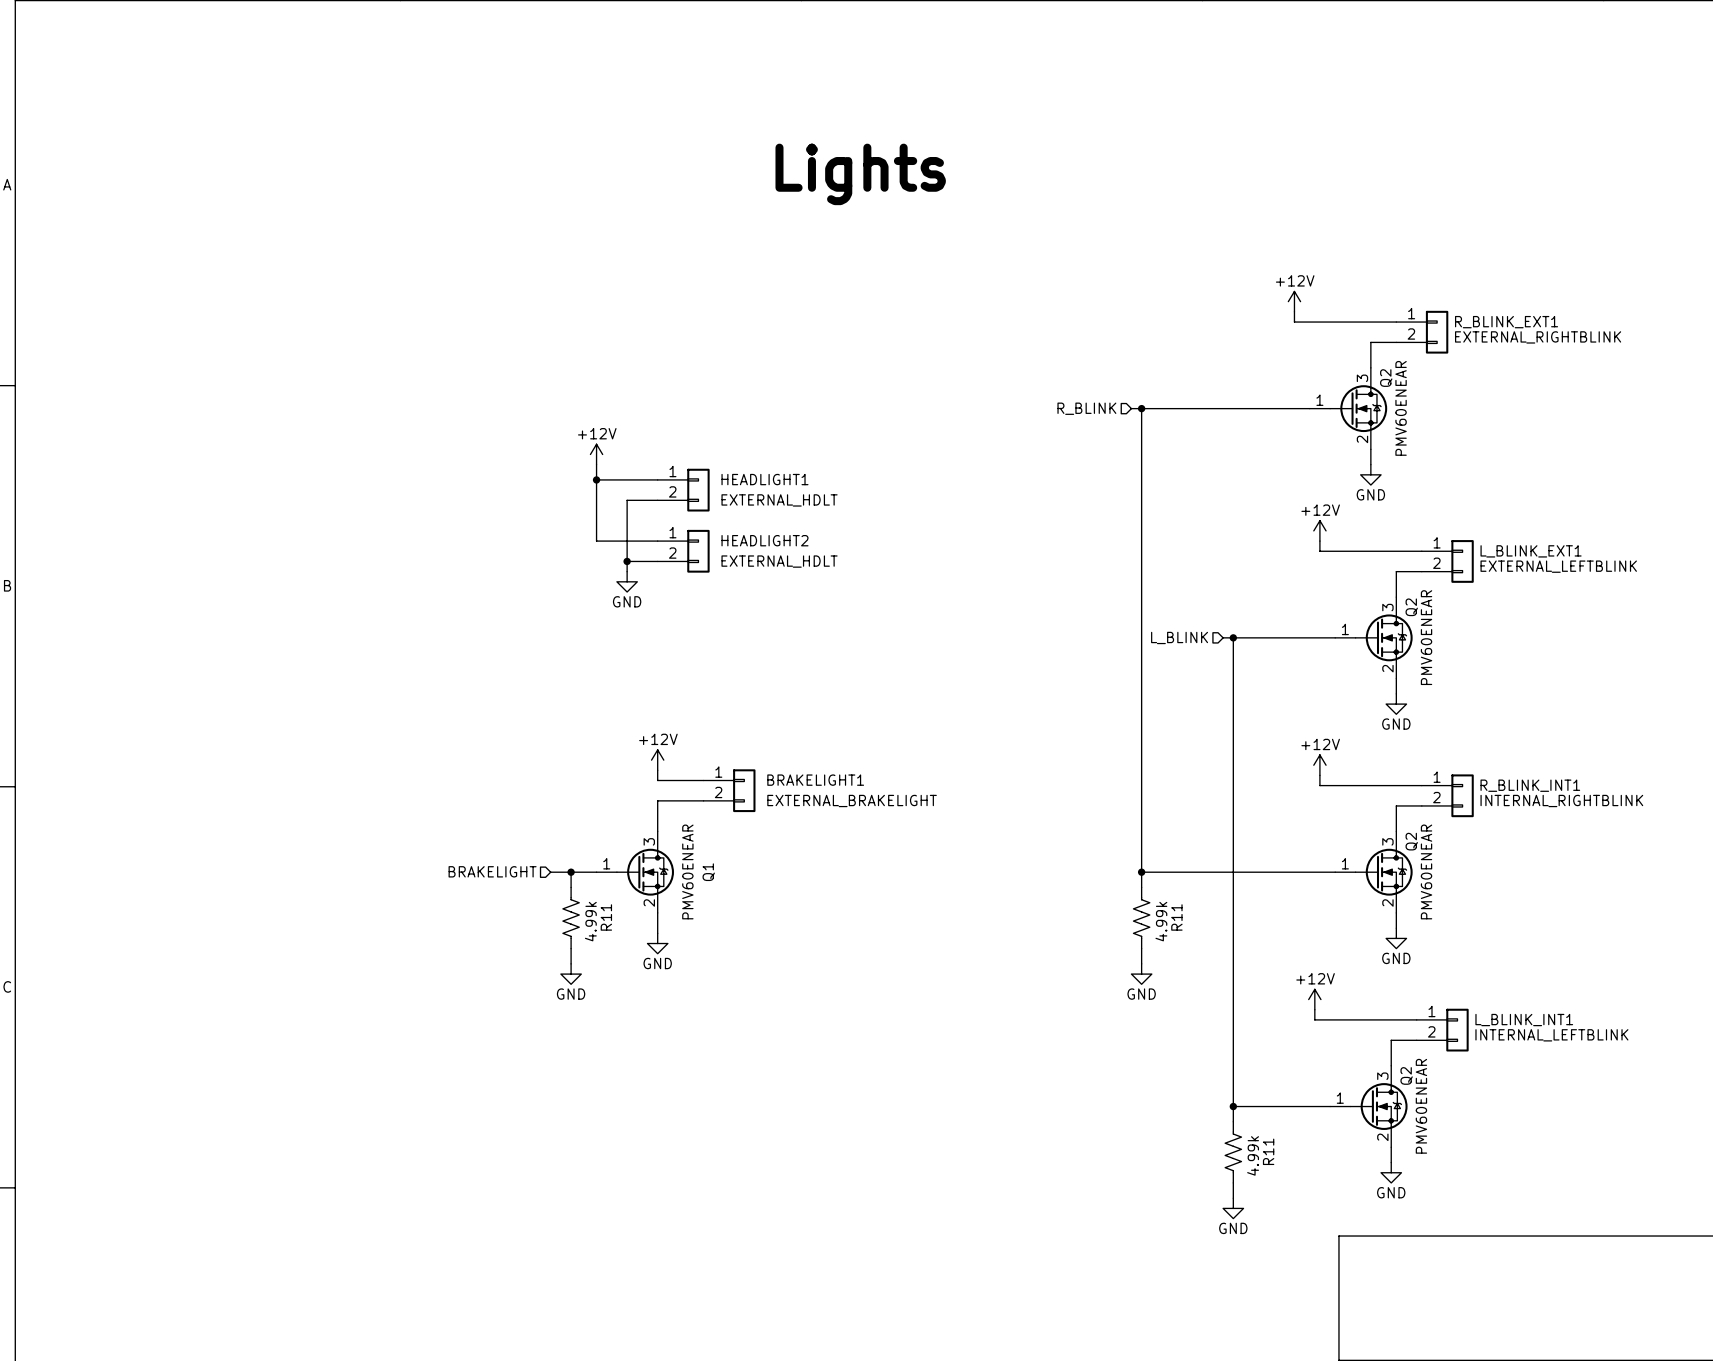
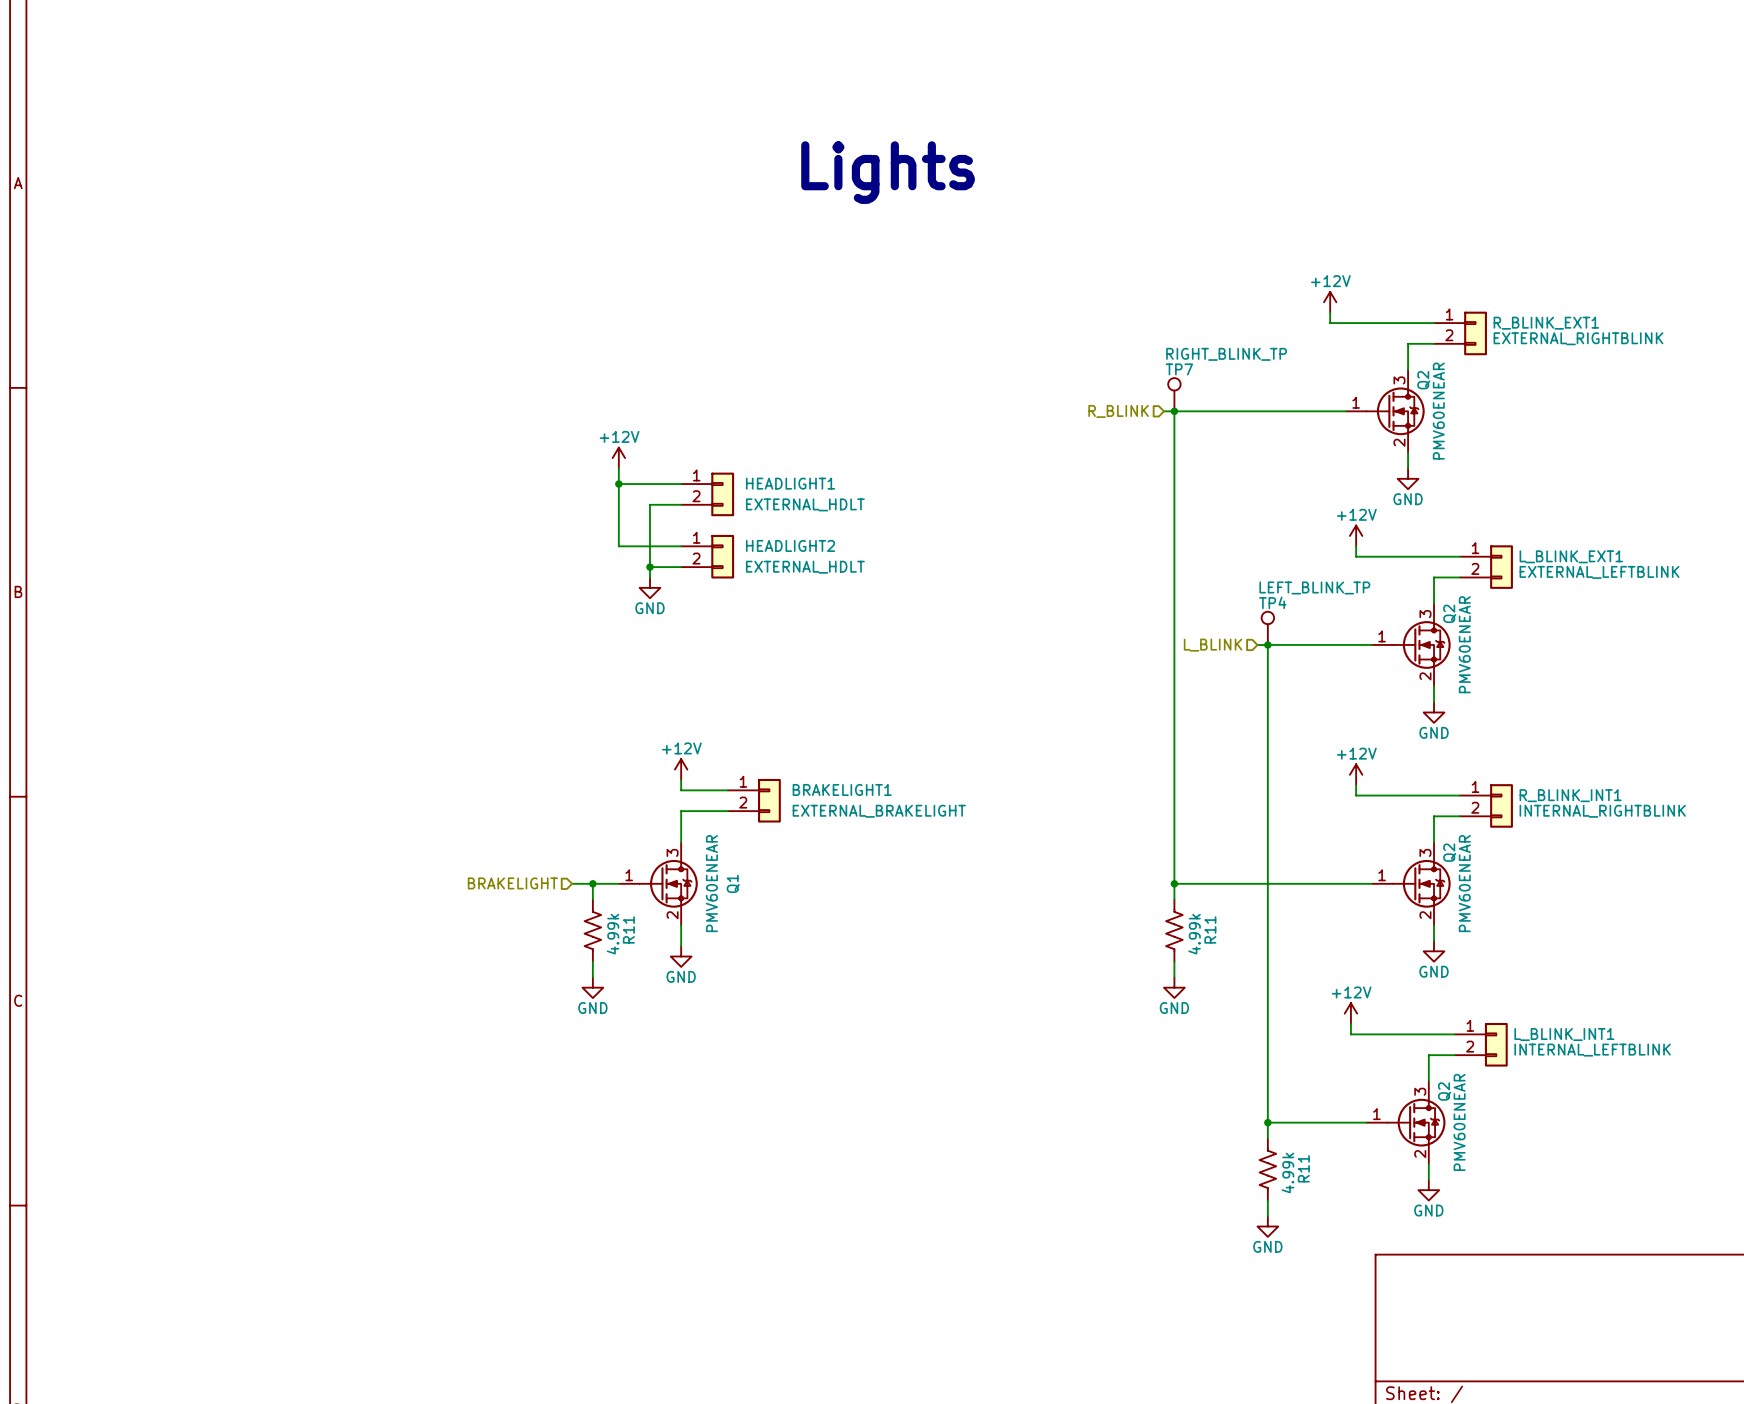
TP7: none -> RIGHT_BLINK_TP (1174, 394)
TP4: none -> LEFT_BLINK_TP (1267, 628)

